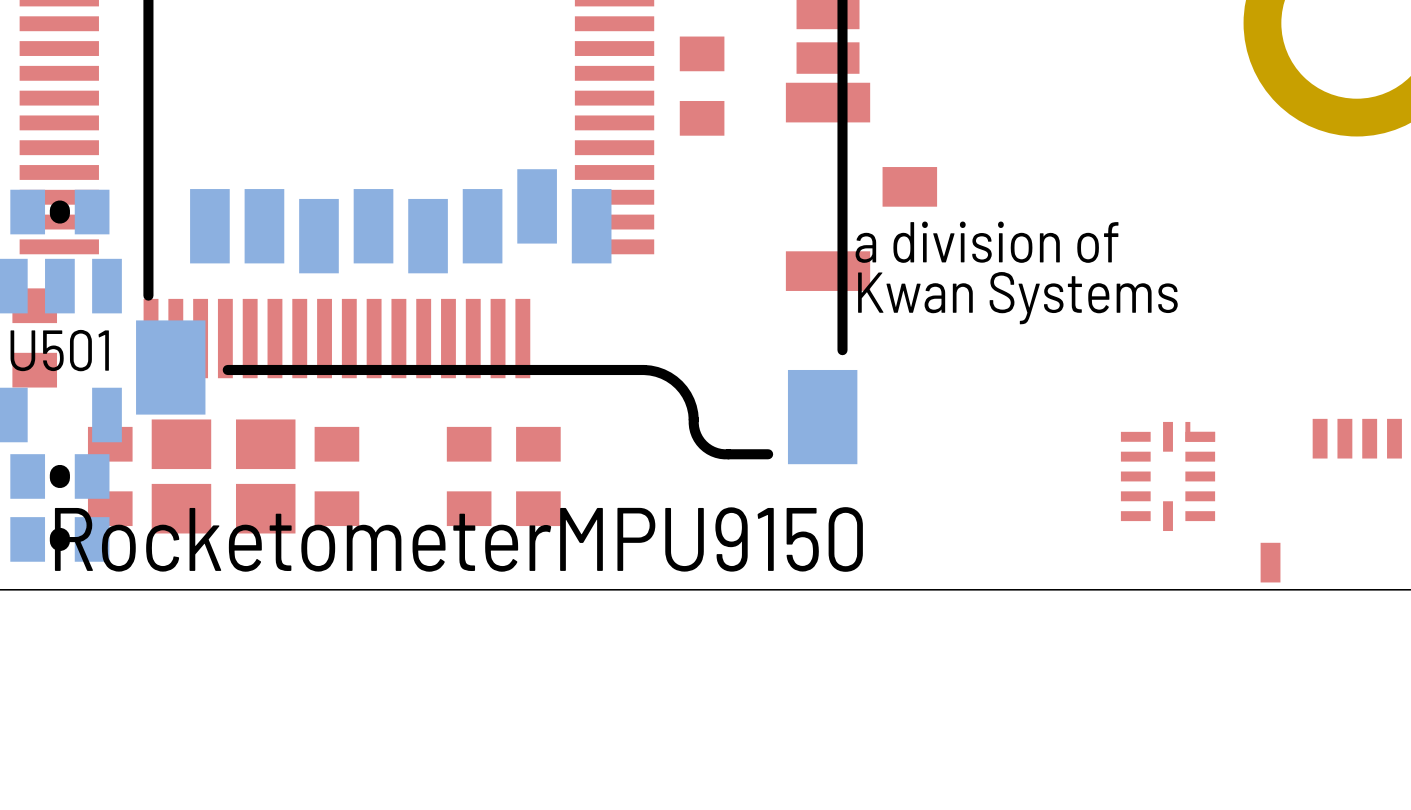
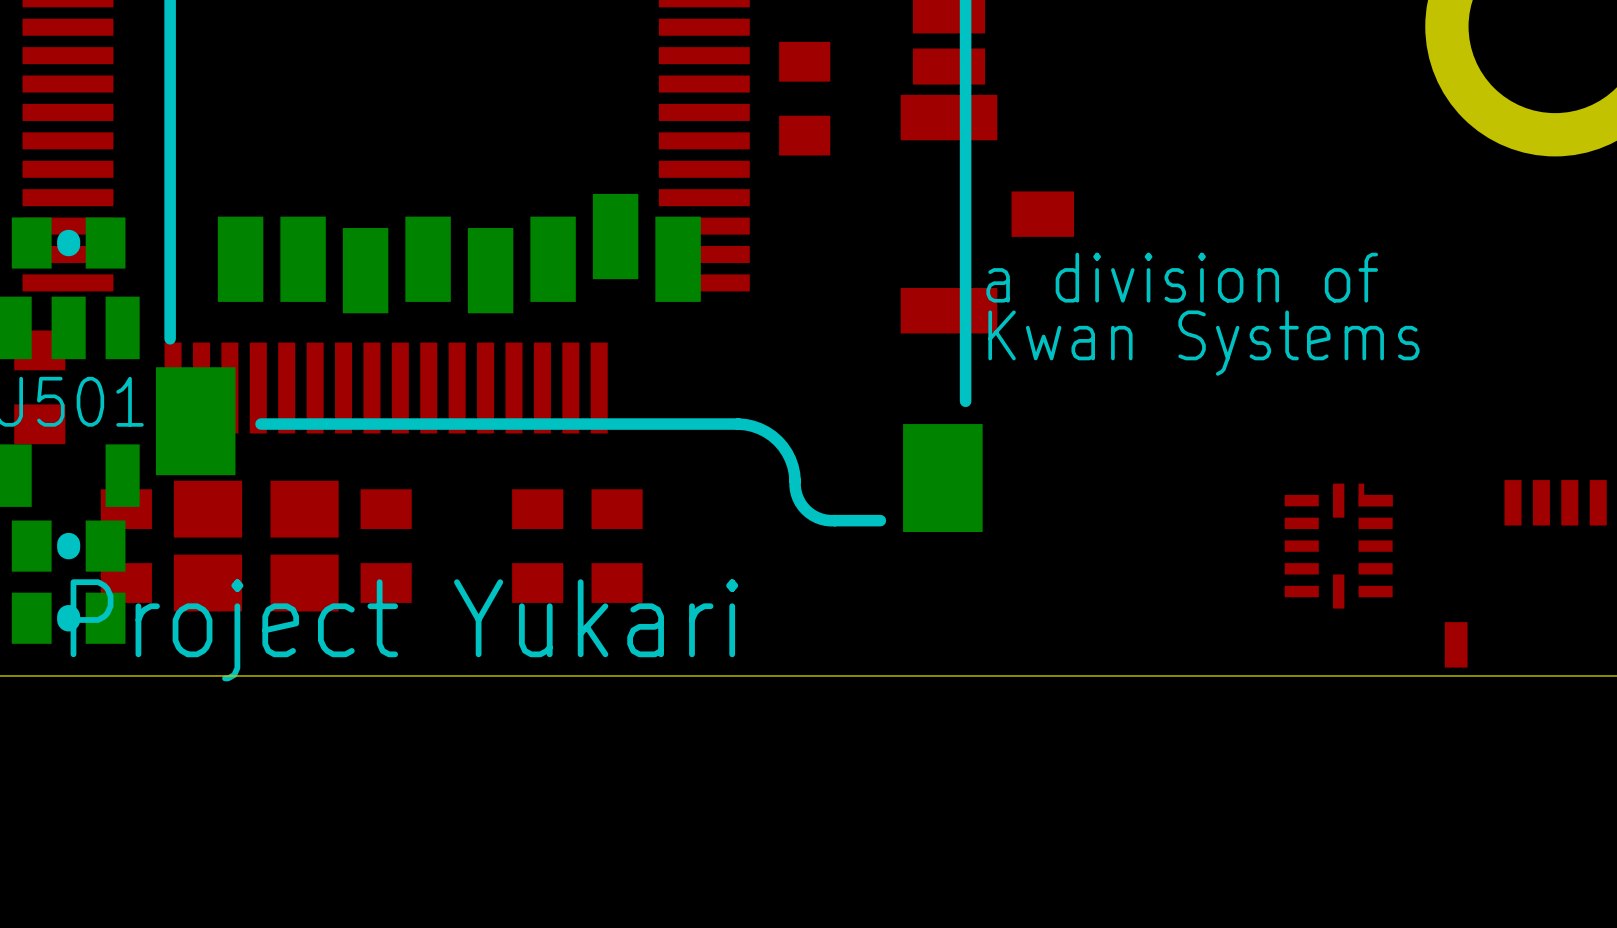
text: RocketometerMPU9150 (458, 539) -> Project Yukari (404, 630)

